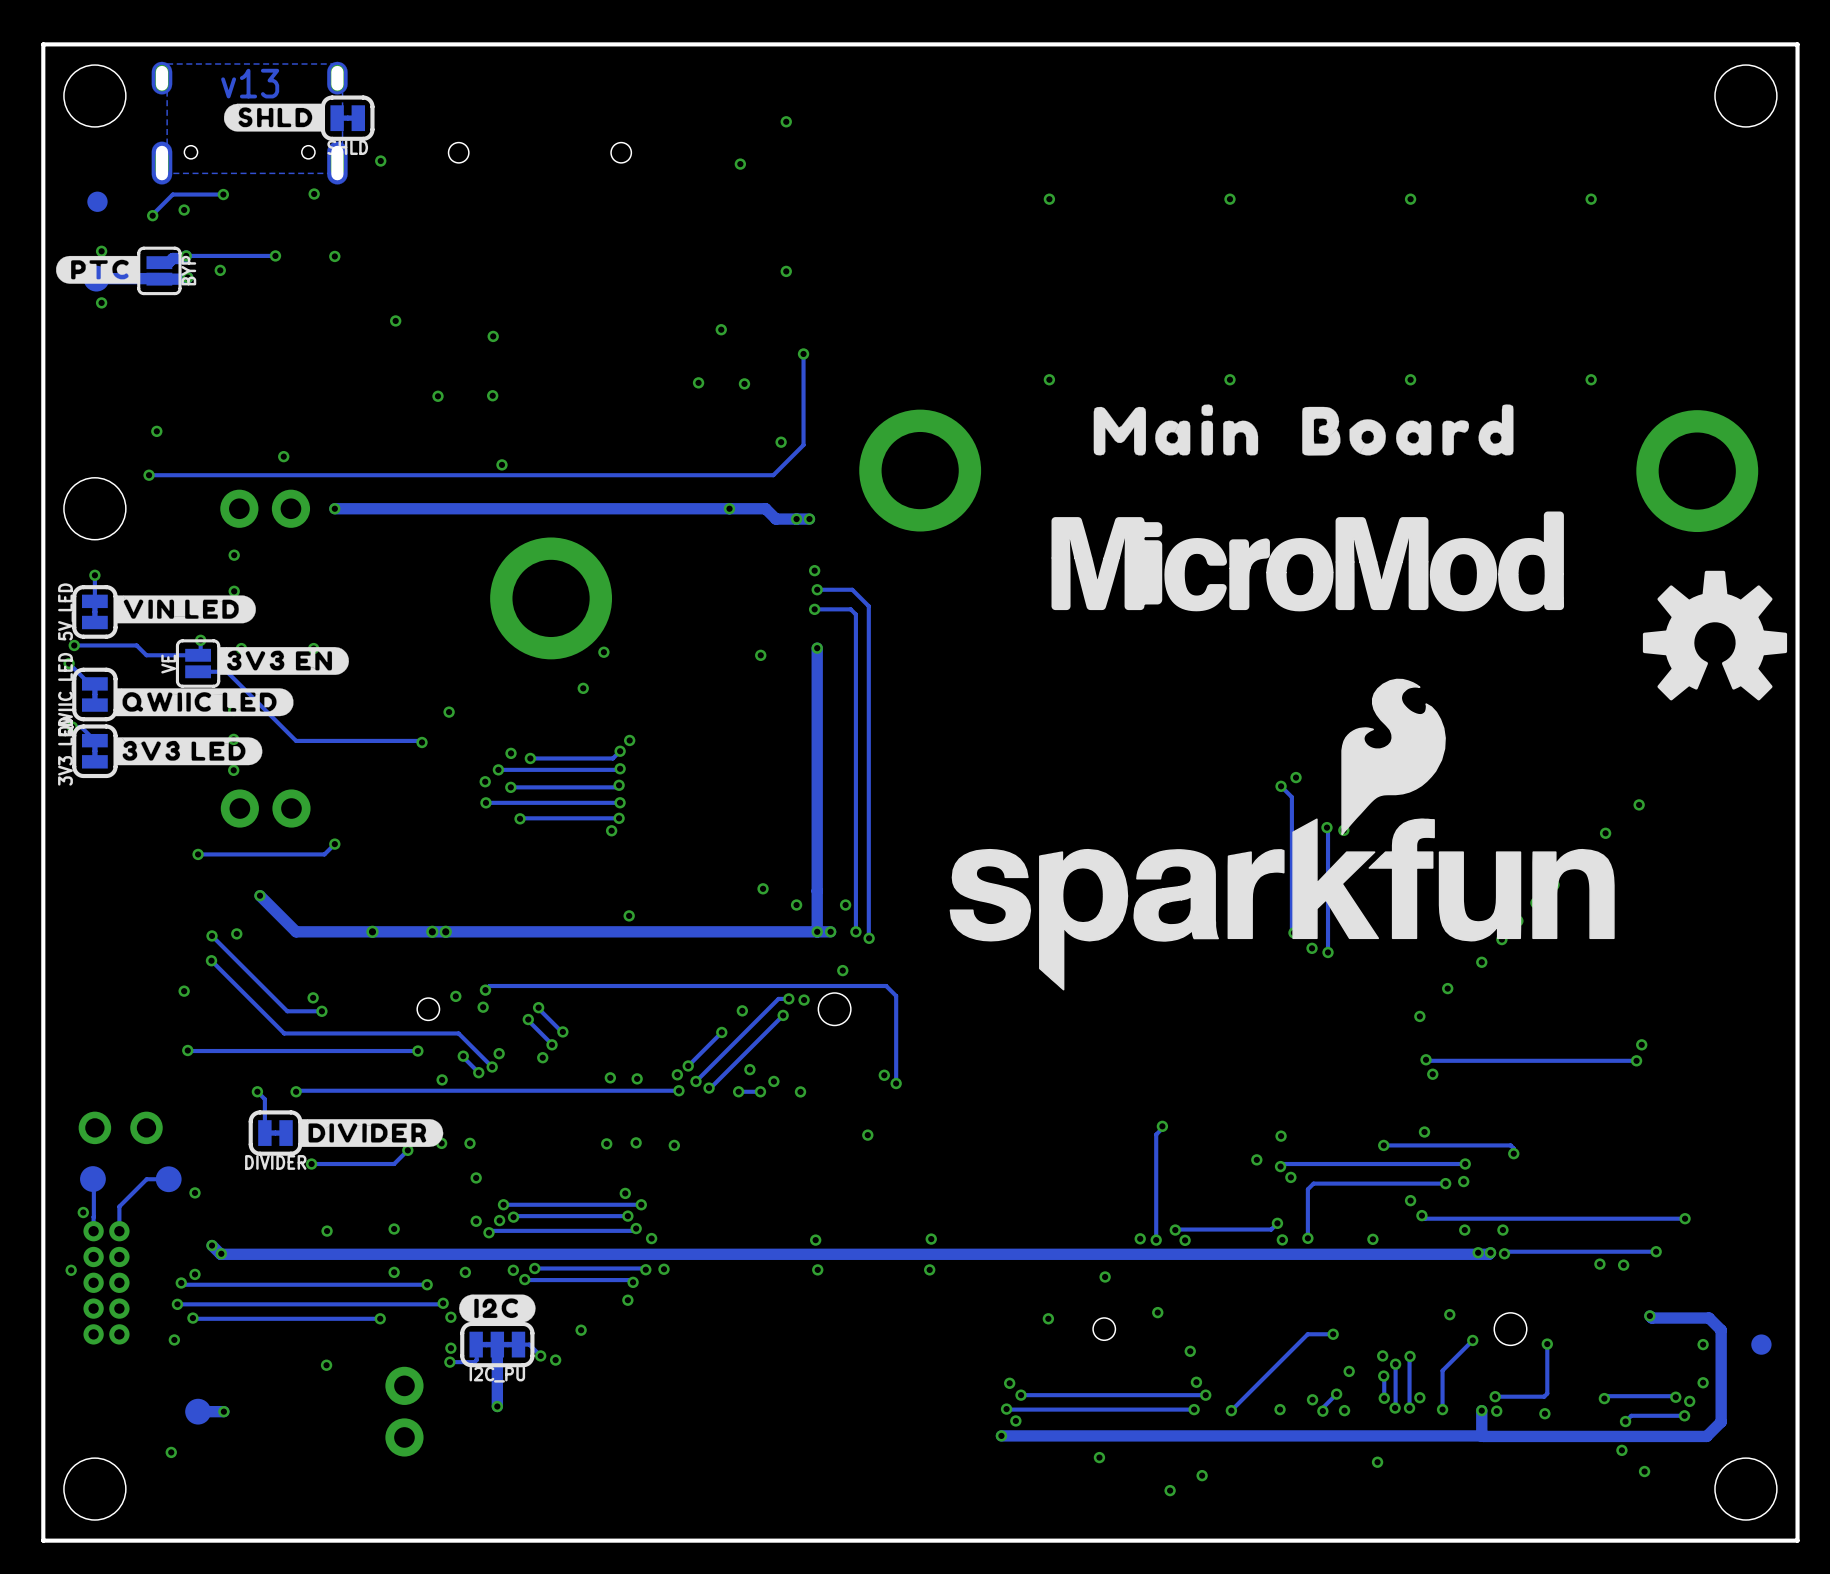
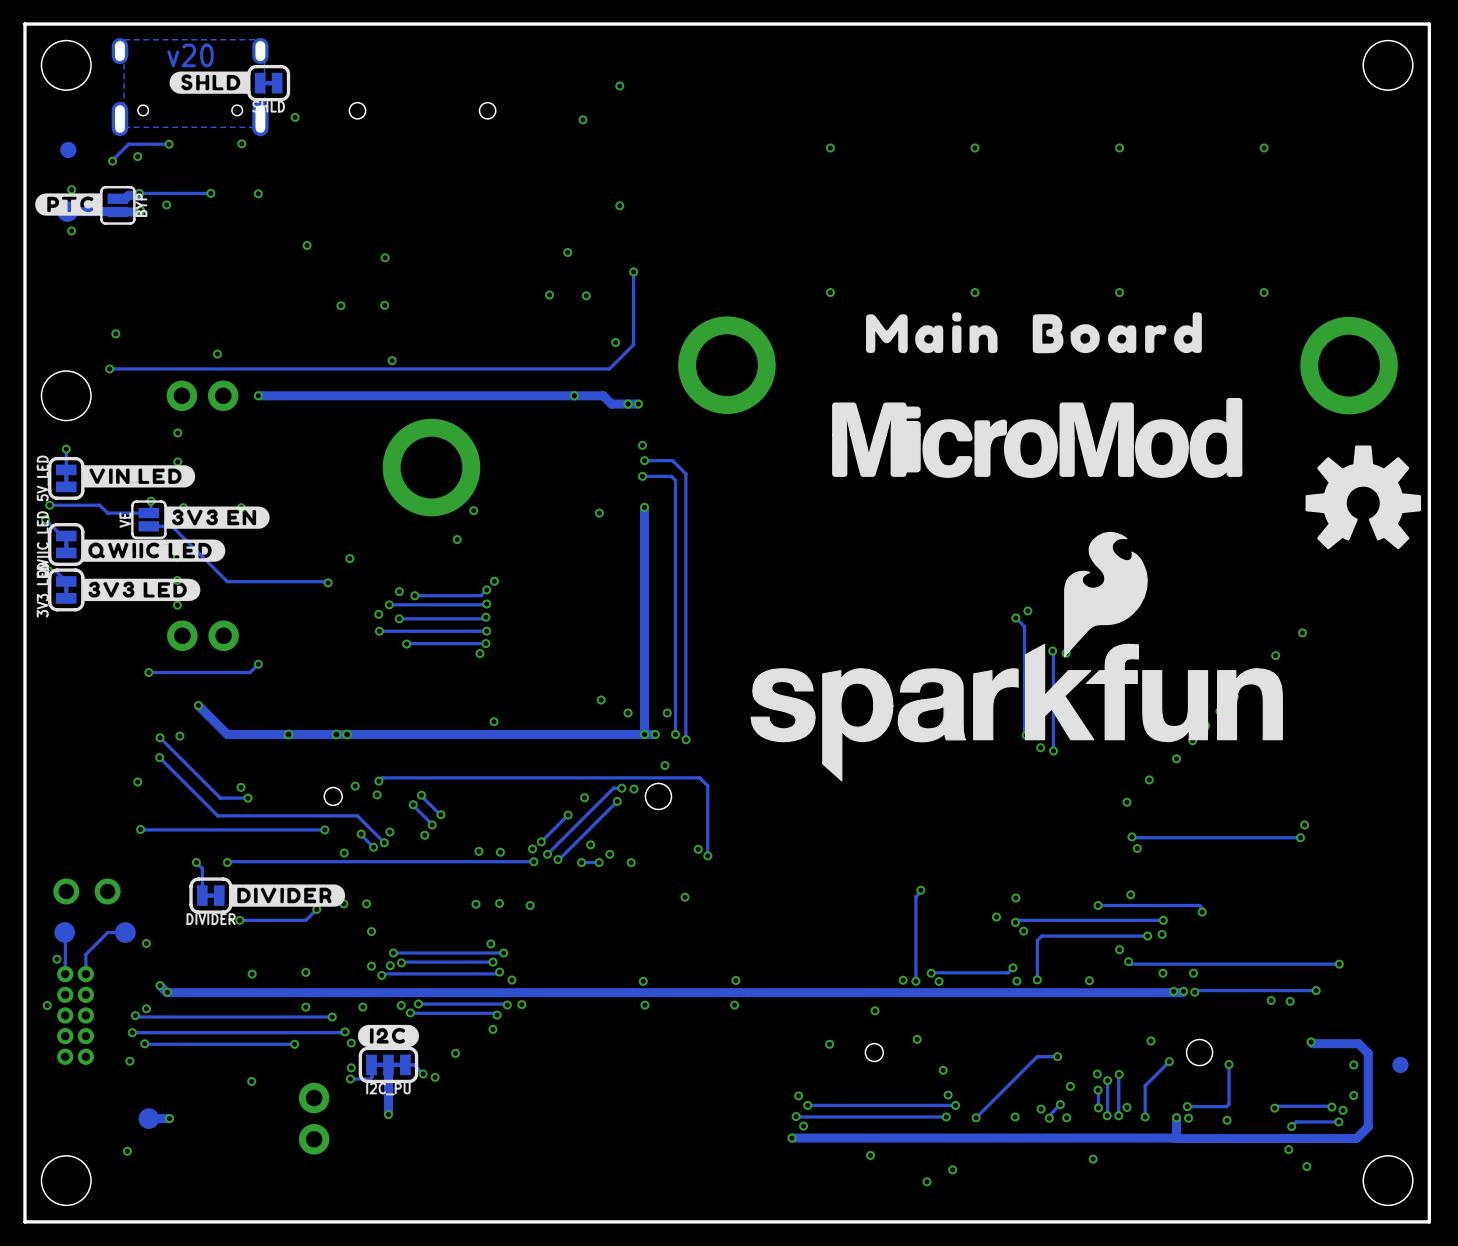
text: v13 (250, 83) -> v20 (190, 55)

